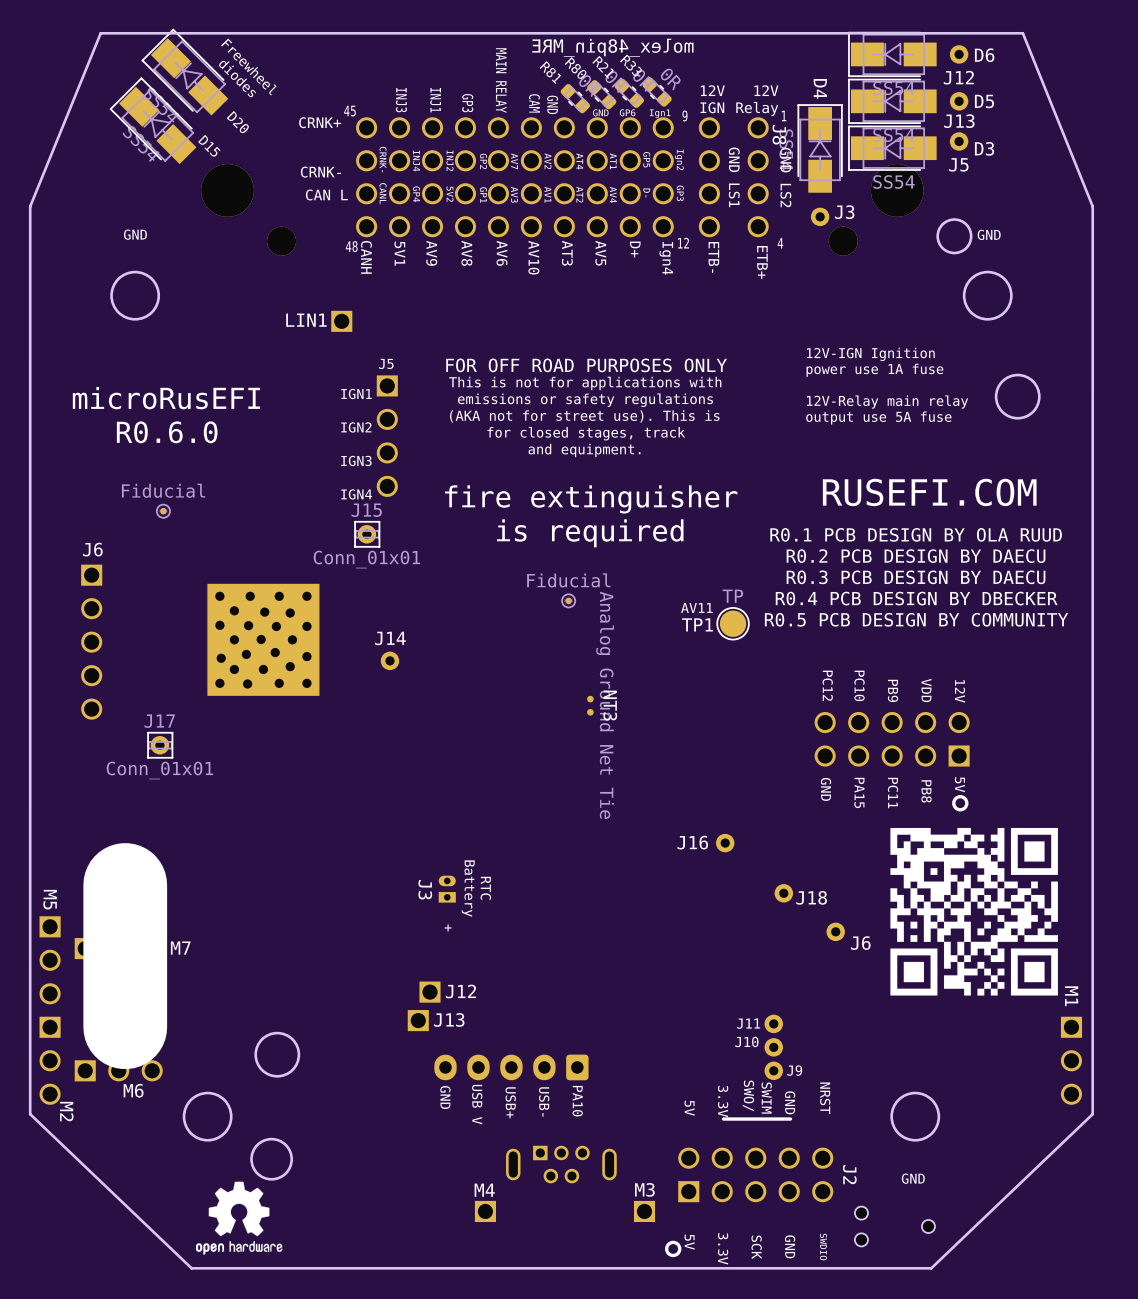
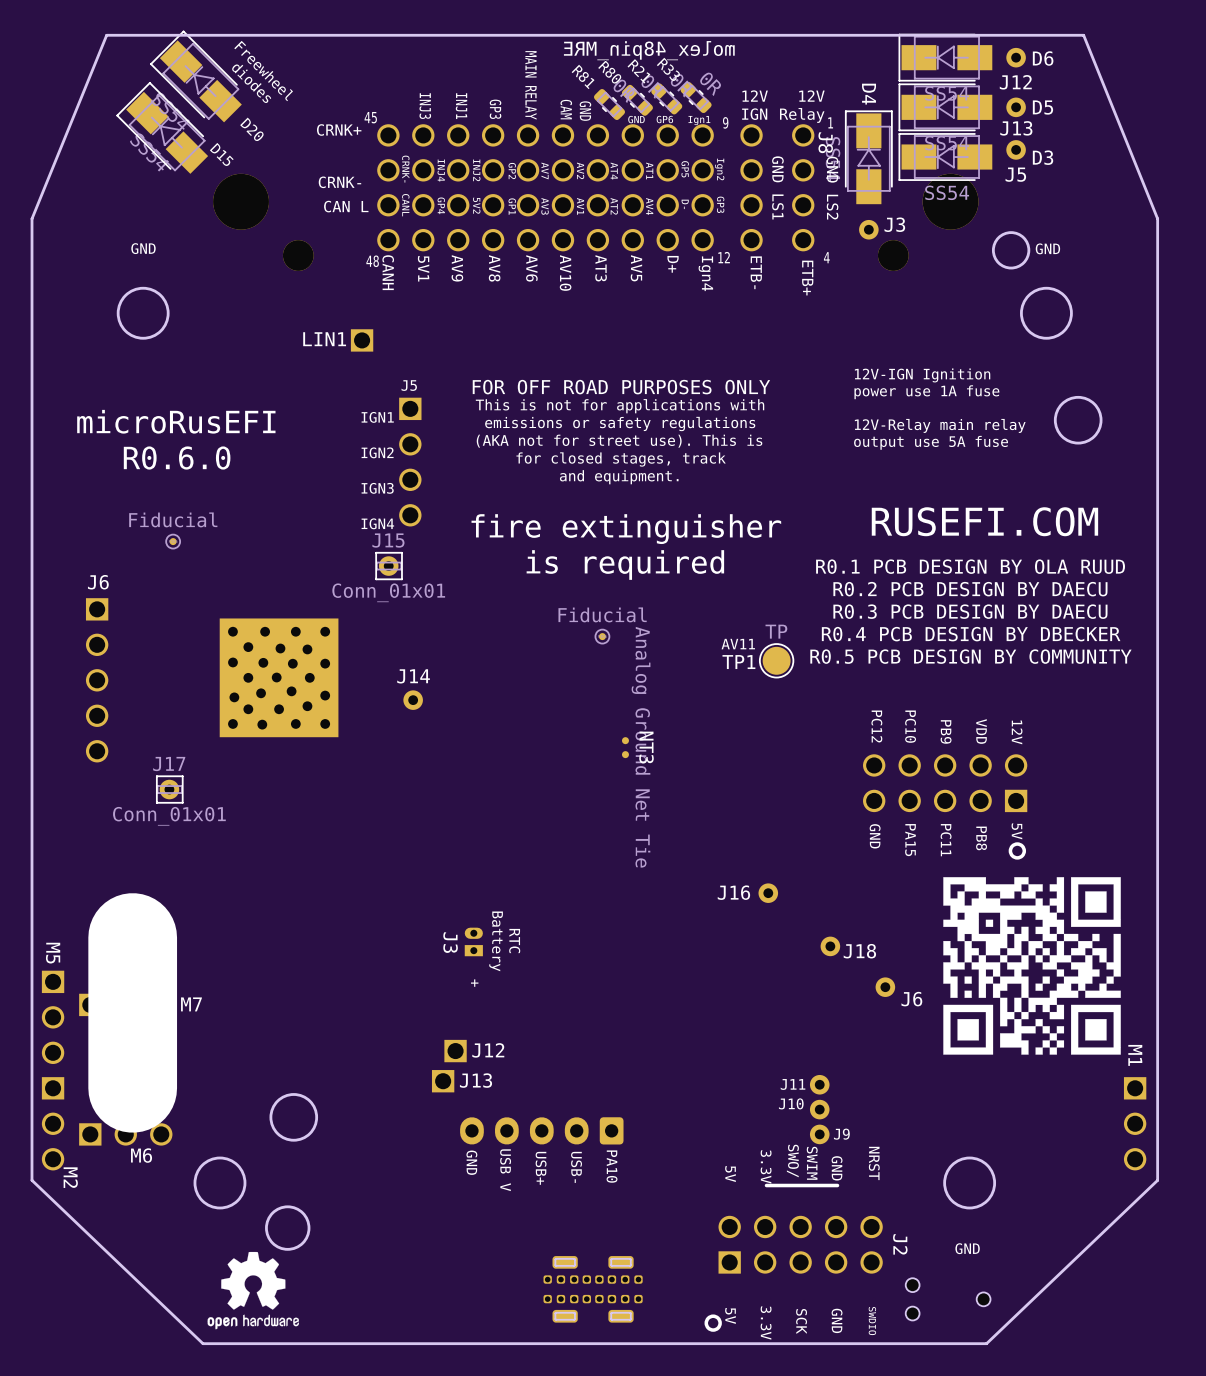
part footprint: [39, 117, 1083, 1258] -> [41, 124, 1147, 1332]
part: (561, 1164) -> none
part: none -> (593, 1289)

